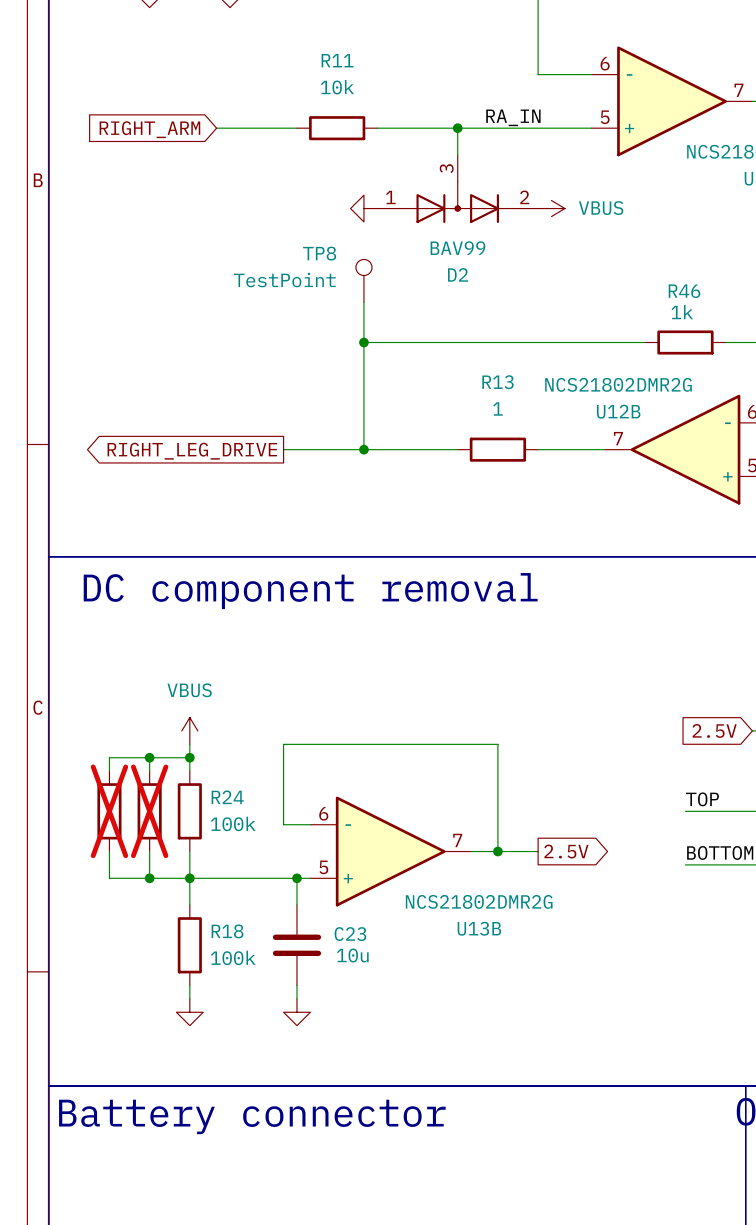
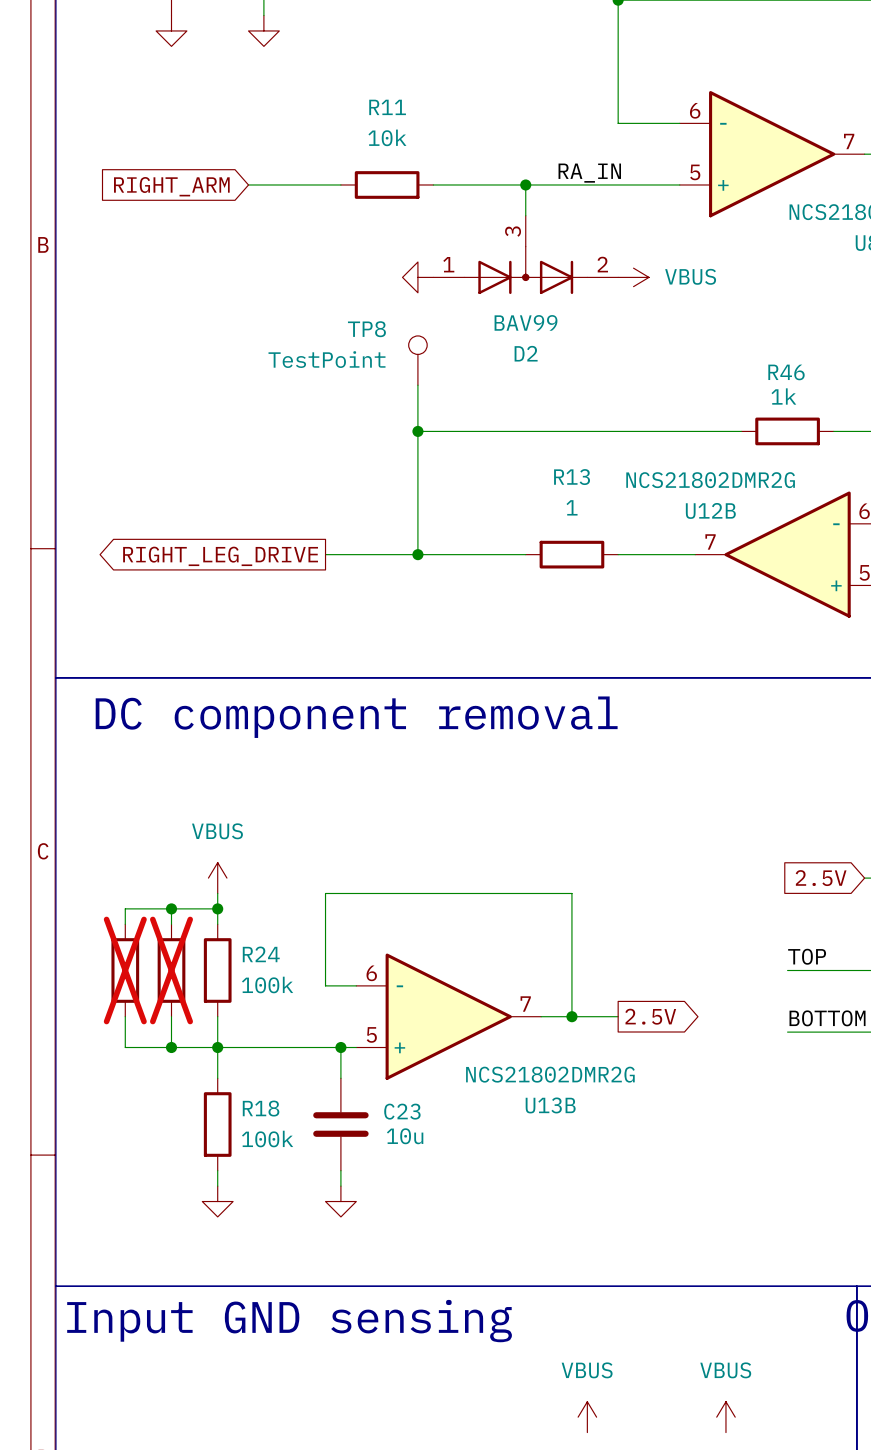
text: Battery connector (252, 1116) -> Input GND sensing (289, 1321)
power symbol: none -> VBUS (587, 1417)
power symbol: none -> VBUS (725, 1417)

